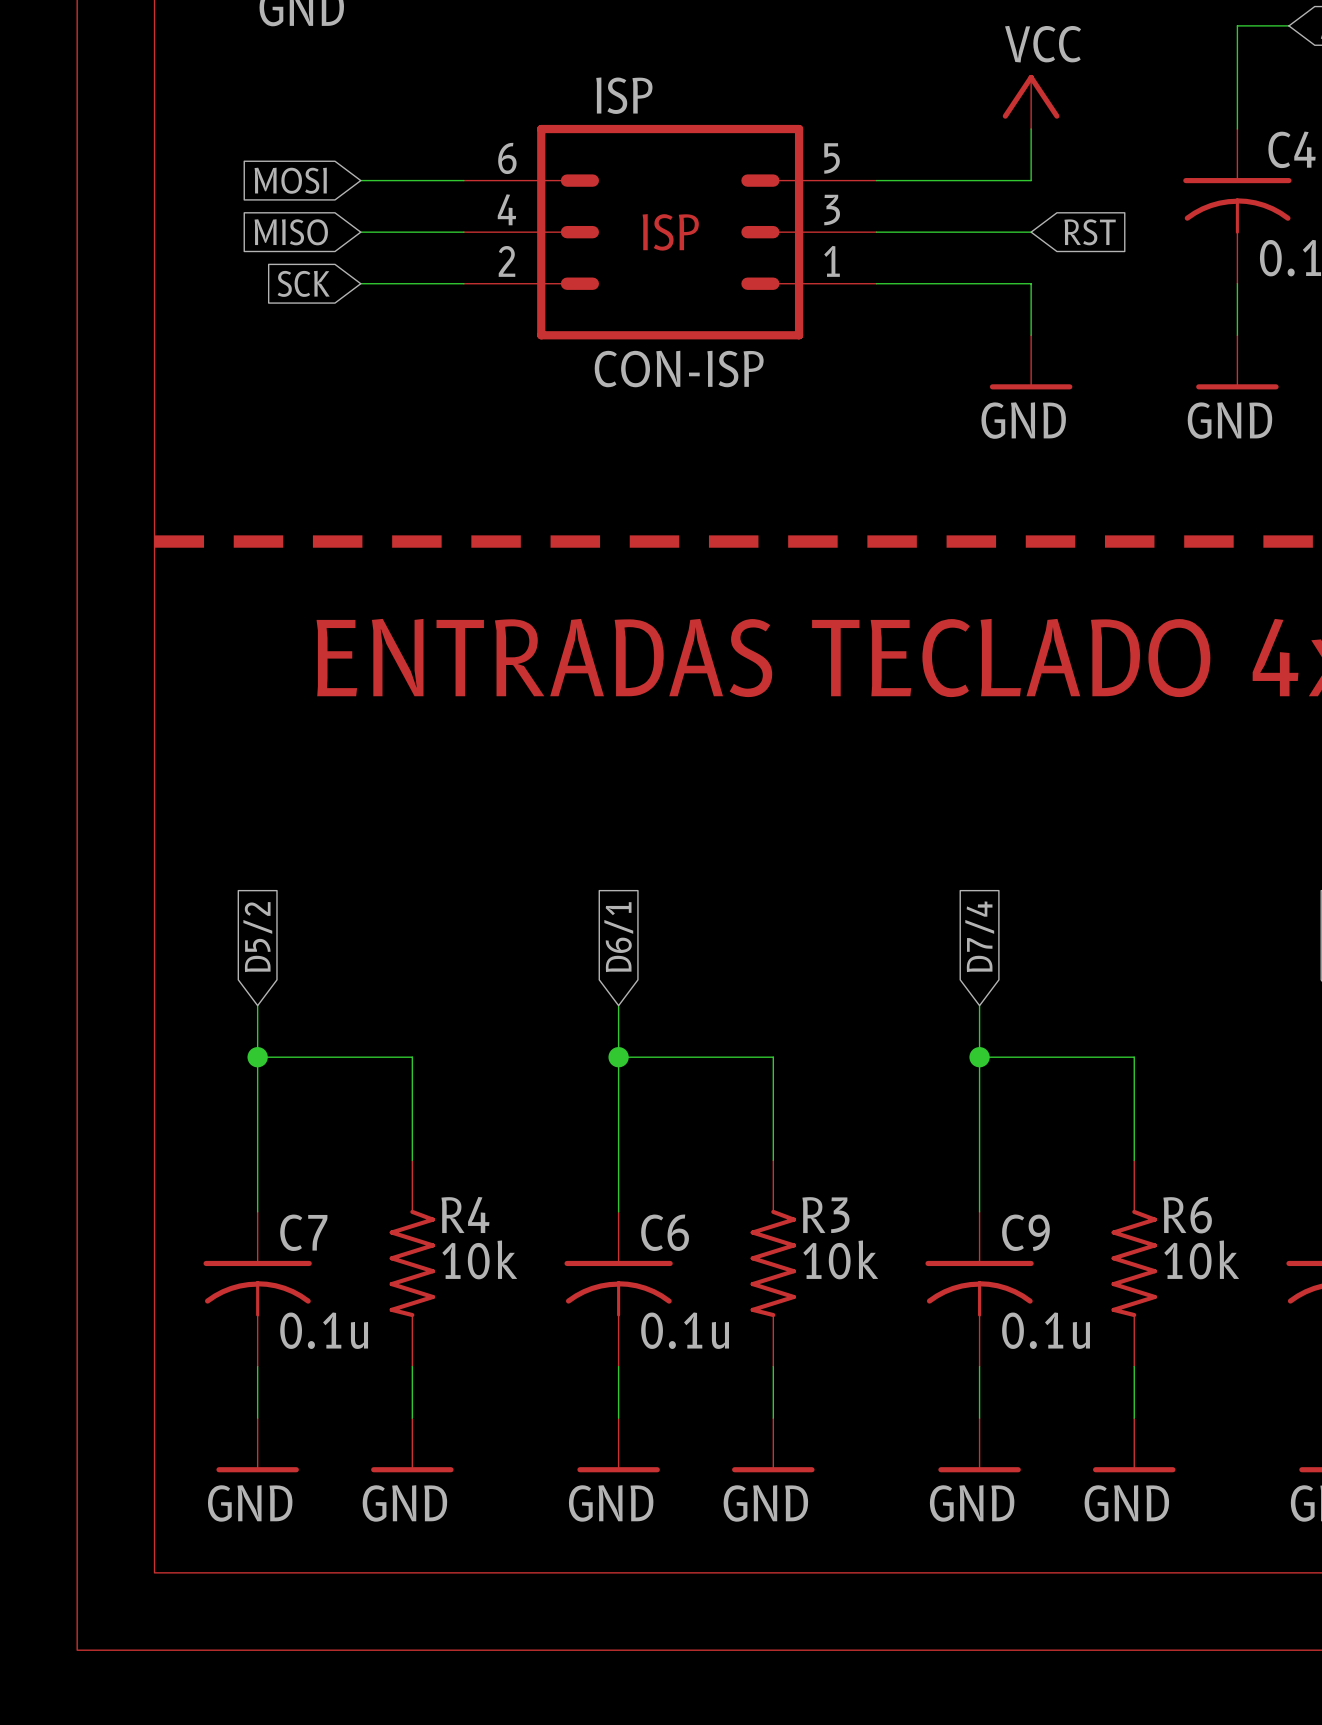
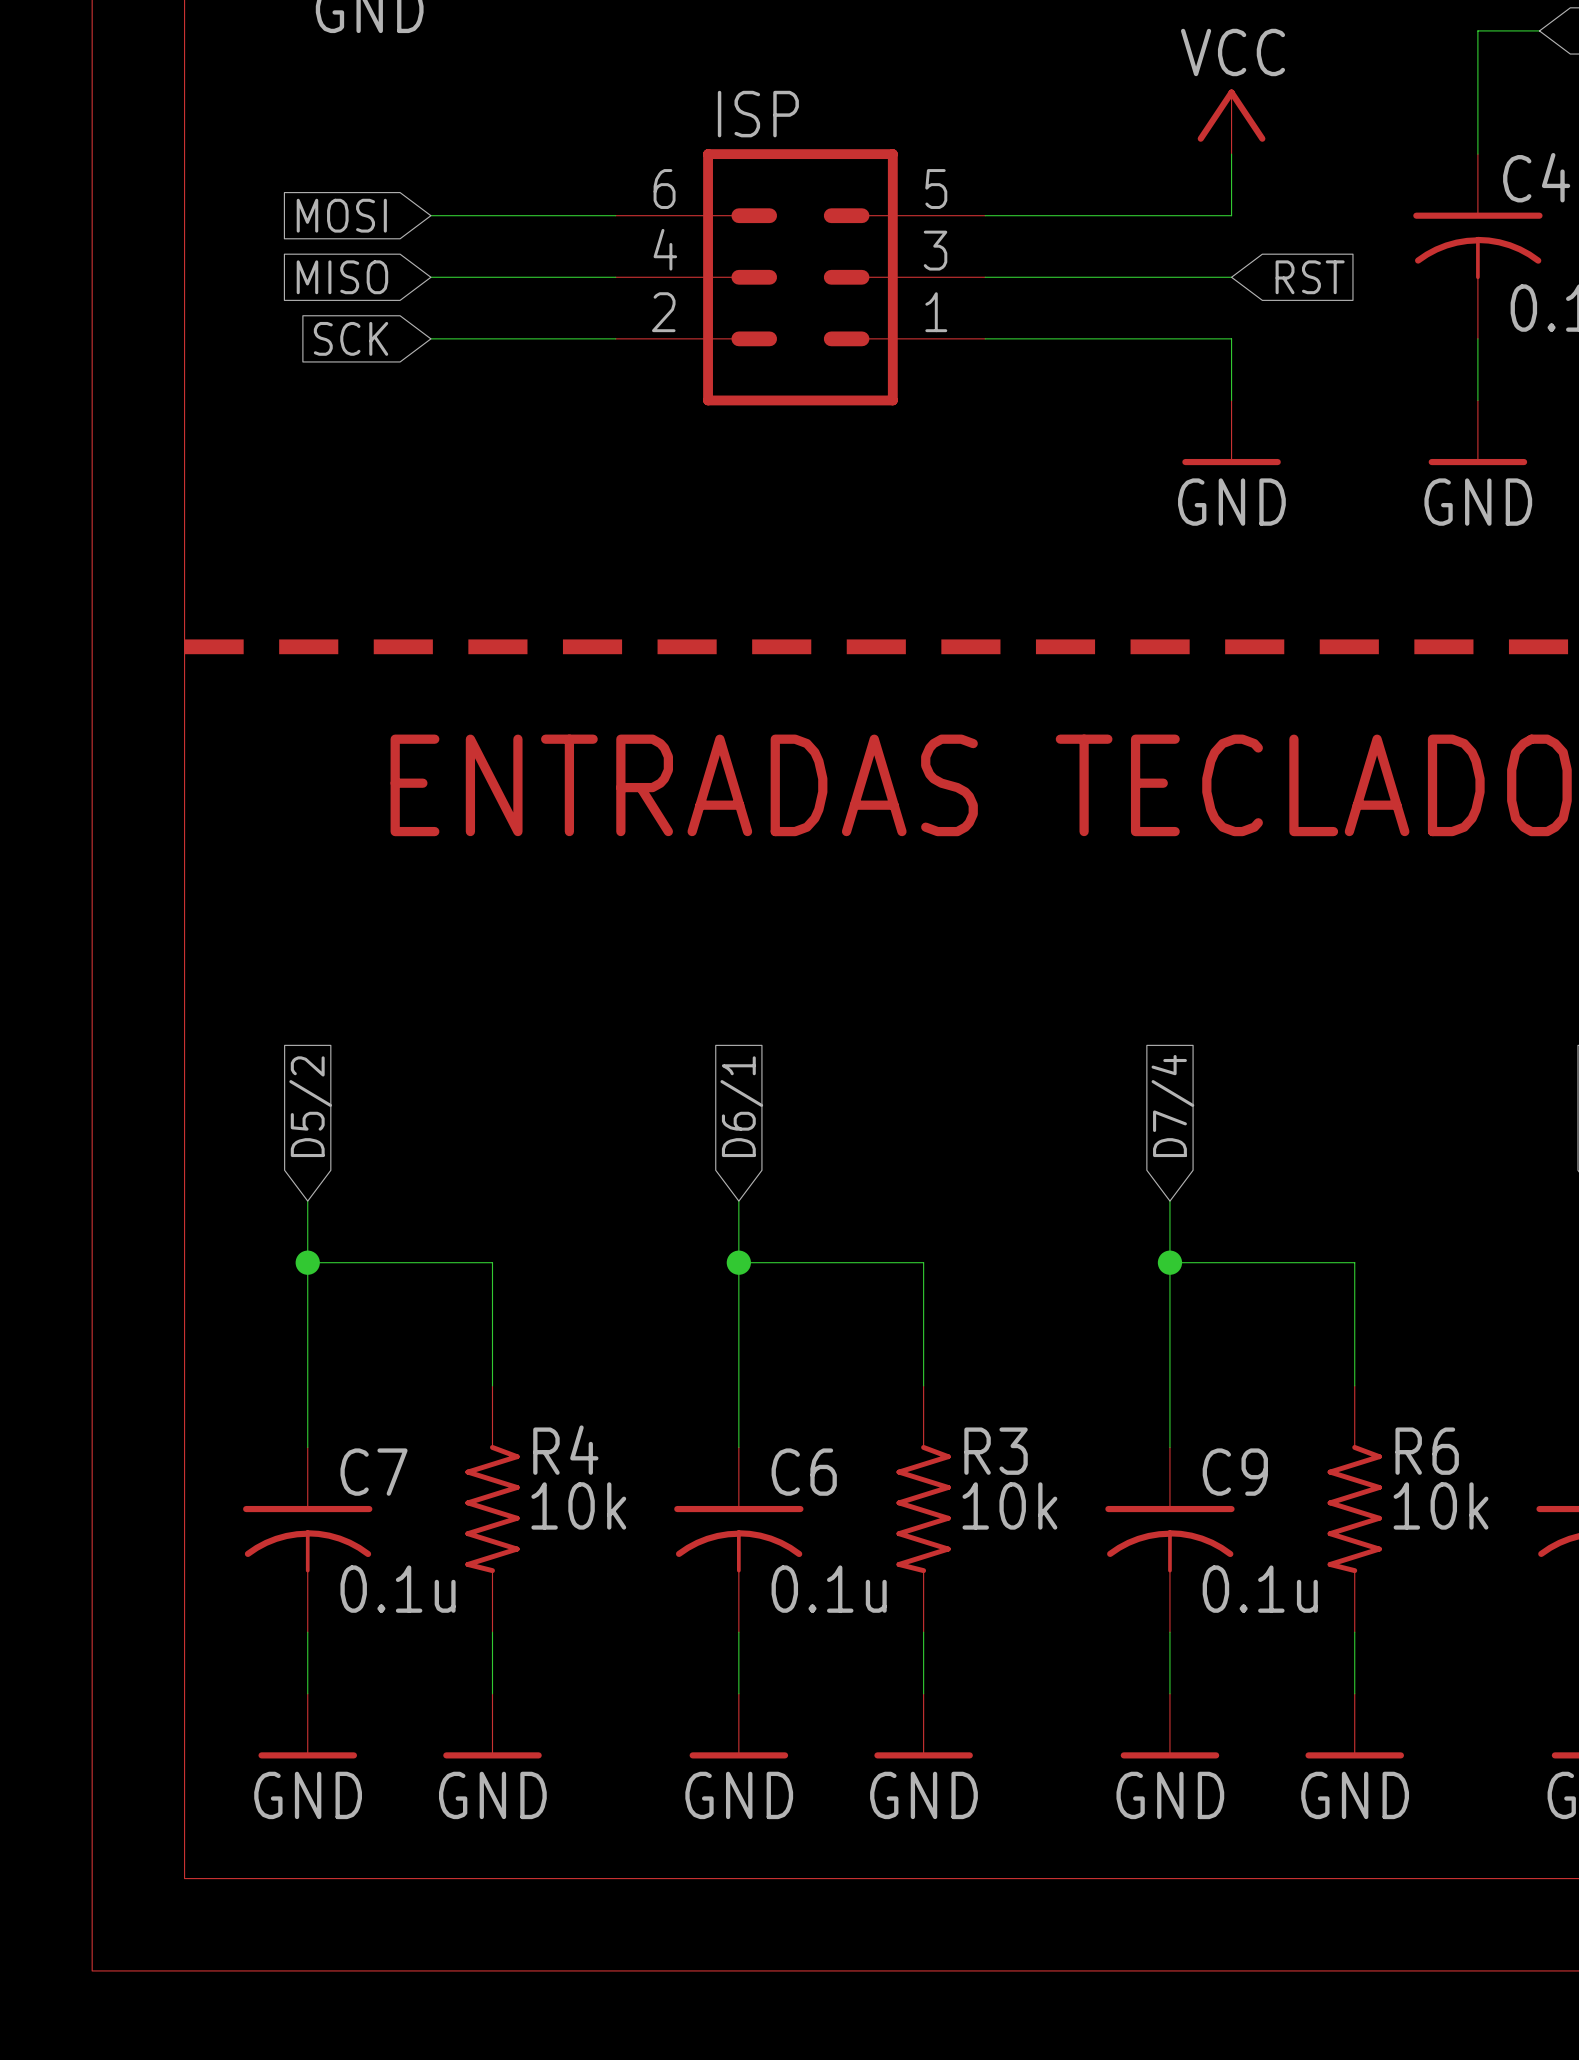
ISP symbol: [463, 124, 877, 340] -> [615, 149, 986, 406]
ISP value: CON-ISP (679, 369) -> none

